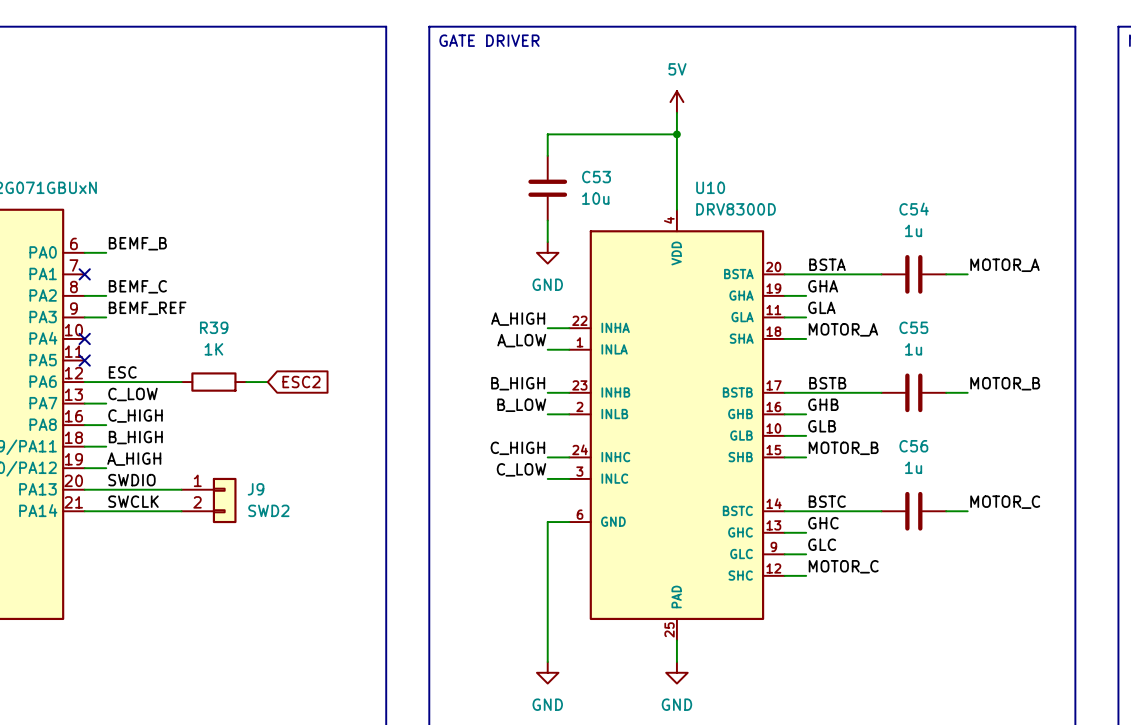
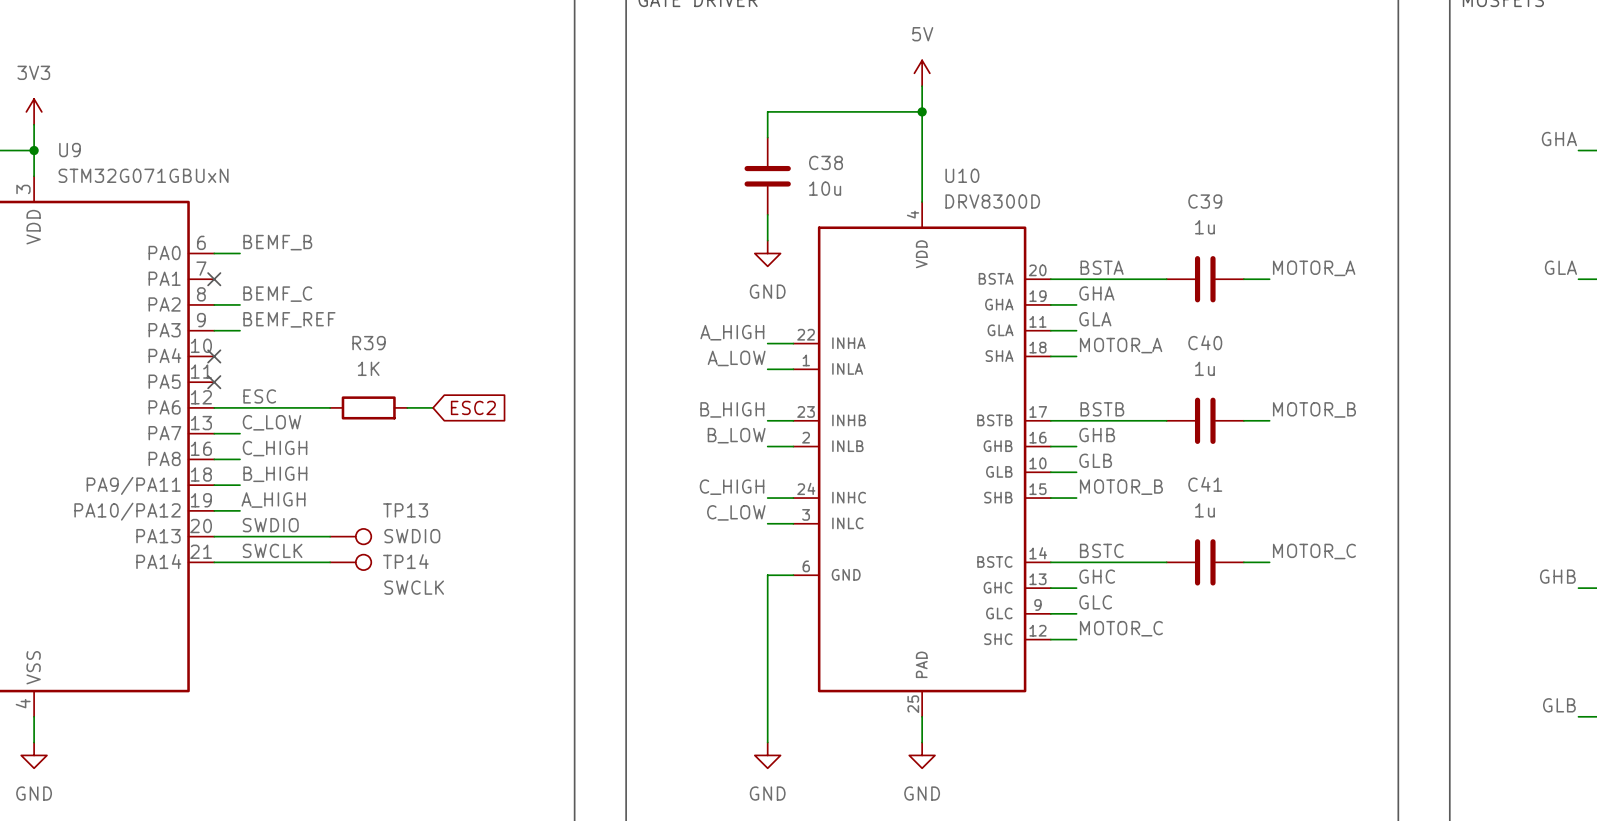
C53 name: C53 (596, 177) -> C38 (826, 162)
C54 name: C54 (914, 209) -> C39 (1205, 201)
C55 name: C55 (913, 327) -> C40 (1205, 342)
C56 name: C56 (913, 446) -> C41 (1205, 484)
TP13: none -> SWDIO (350, 536)
J9: SWD2 (209, 500) -> none
TP14: none -> SWCLK (350, 562)

